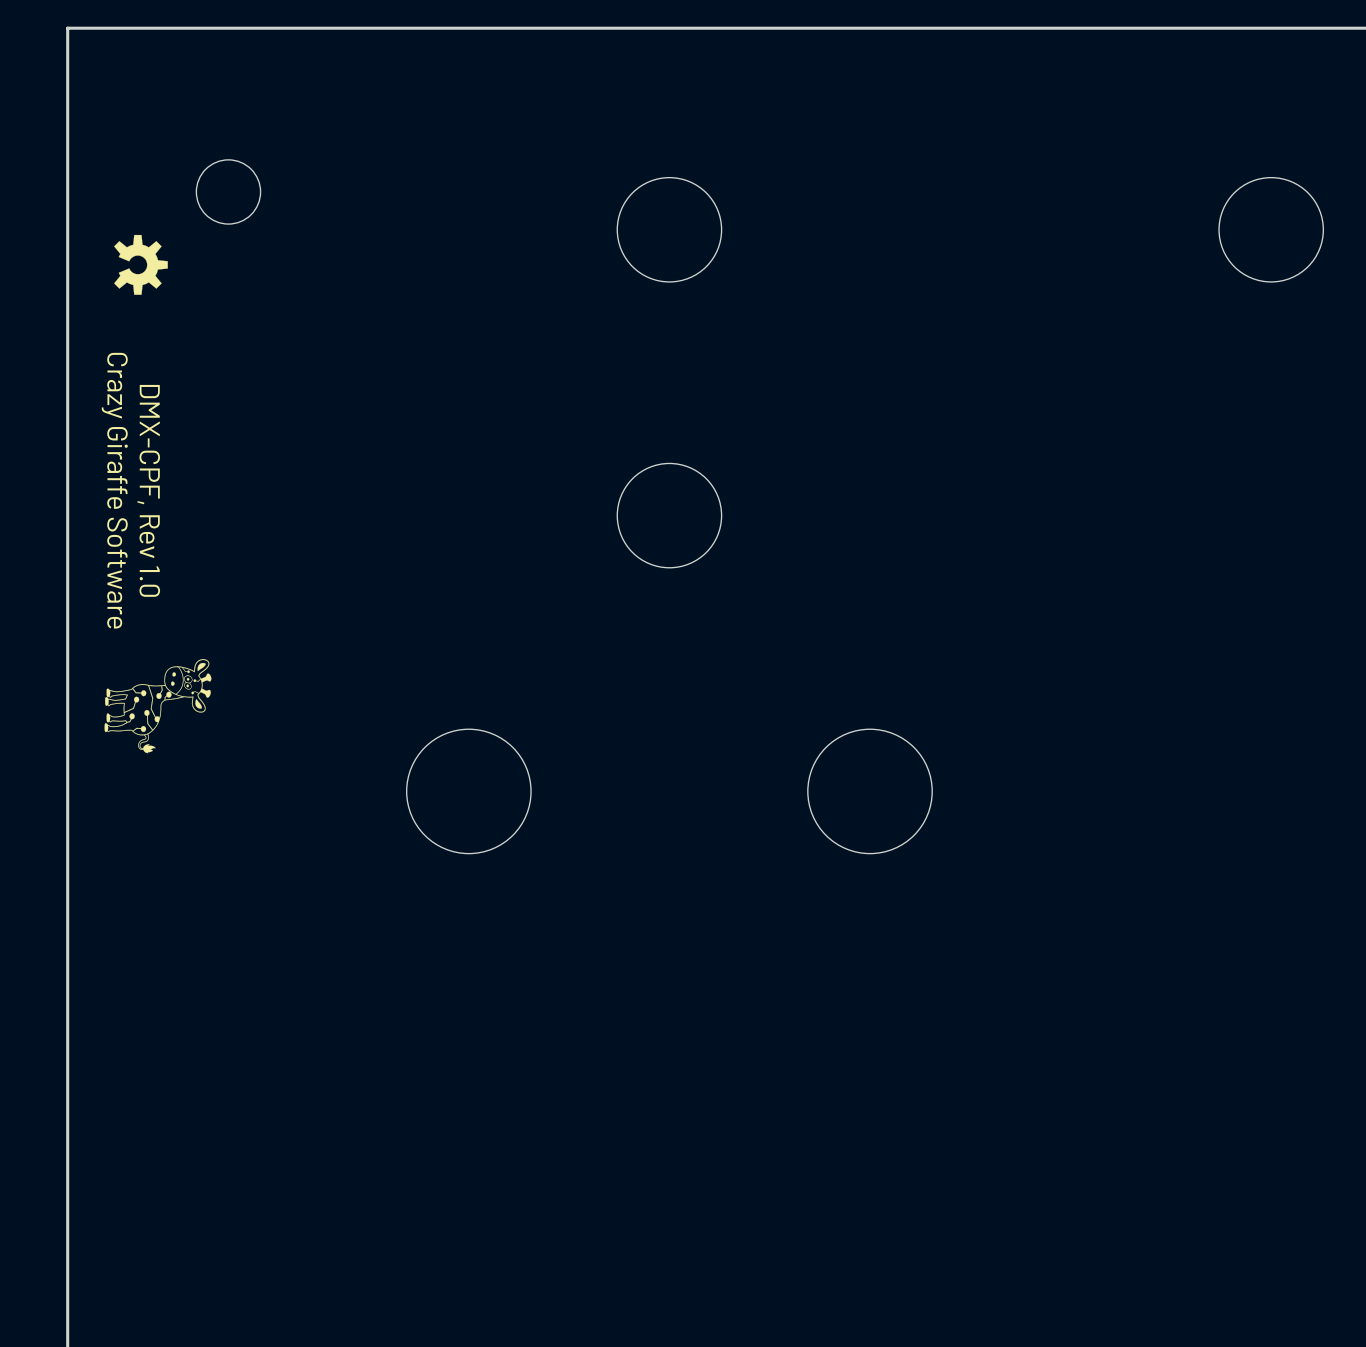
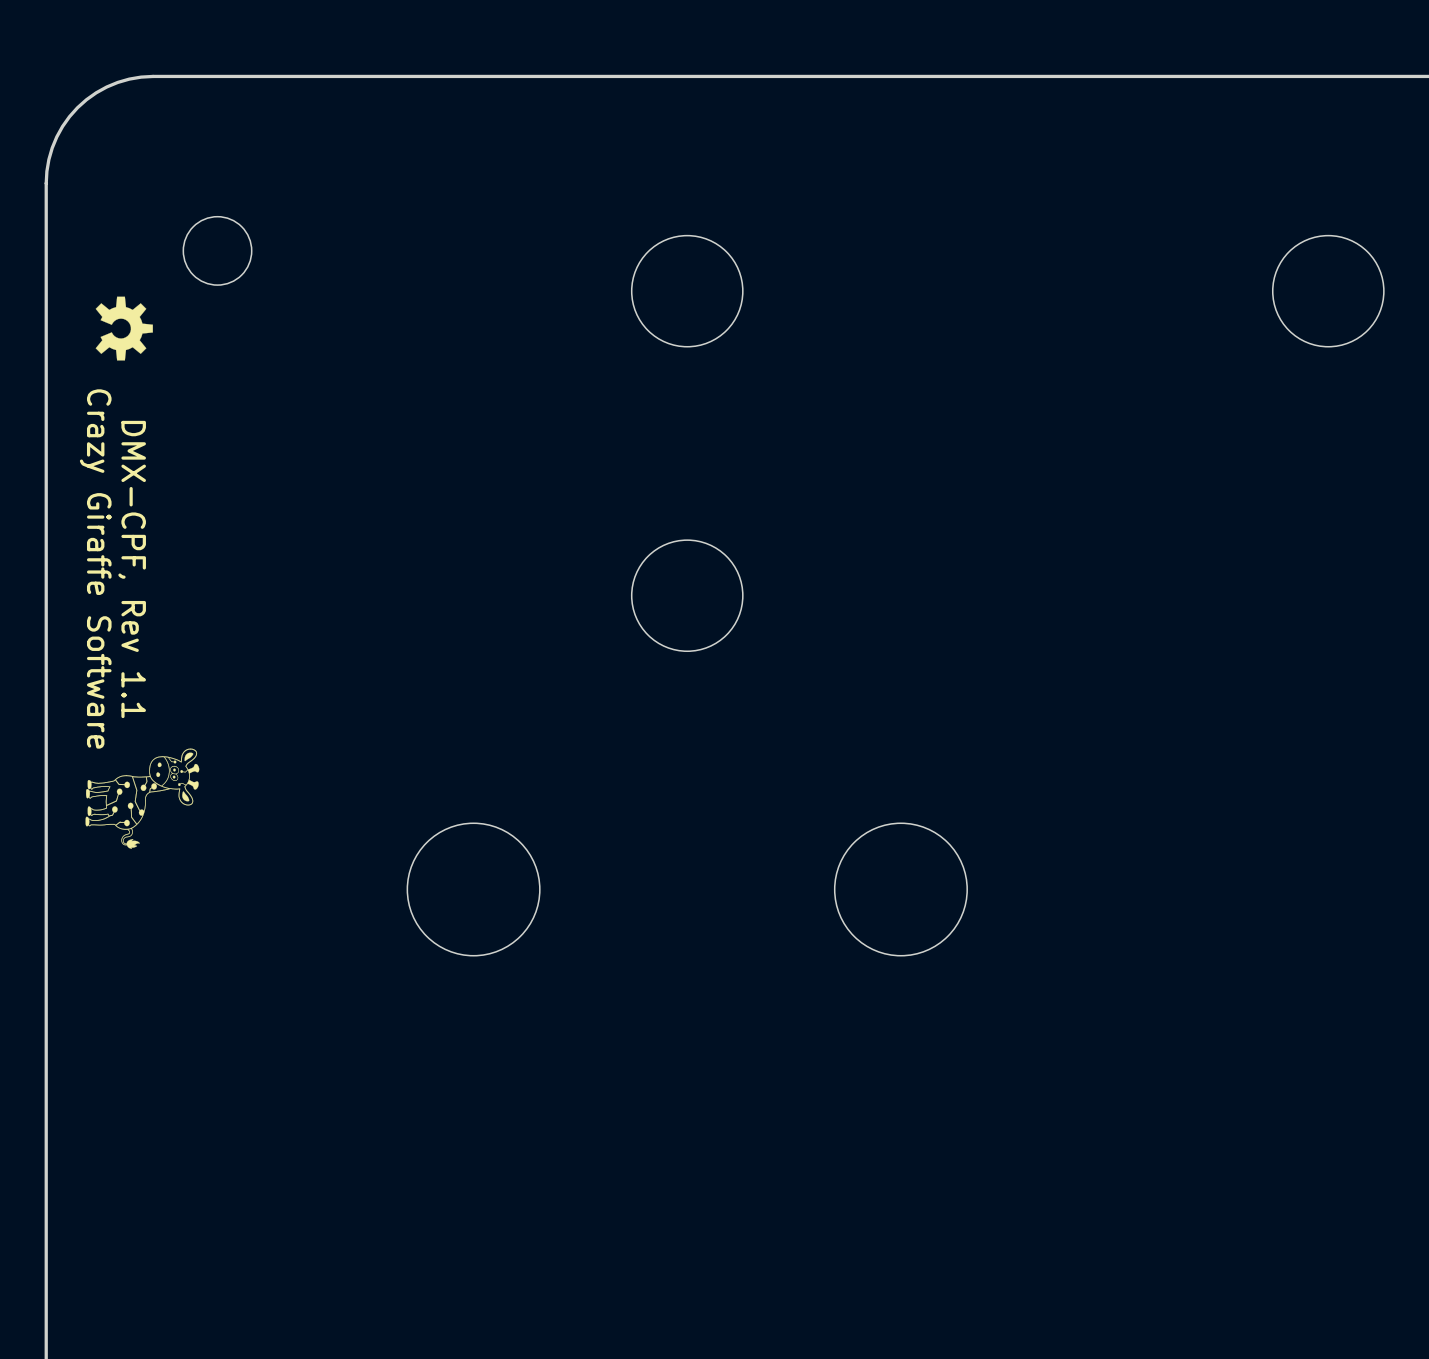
board edge: (167, 28) (67, 28) (67, 128) -> (153, 76) (117, 82) (96, 92) (77, 107) (62, 126) (52, 147) (46, 183)
text: DMX-CPF, Rev 1.0 (148, 490) -> DMX-CPF, Rev 1.1 (132, 569)

